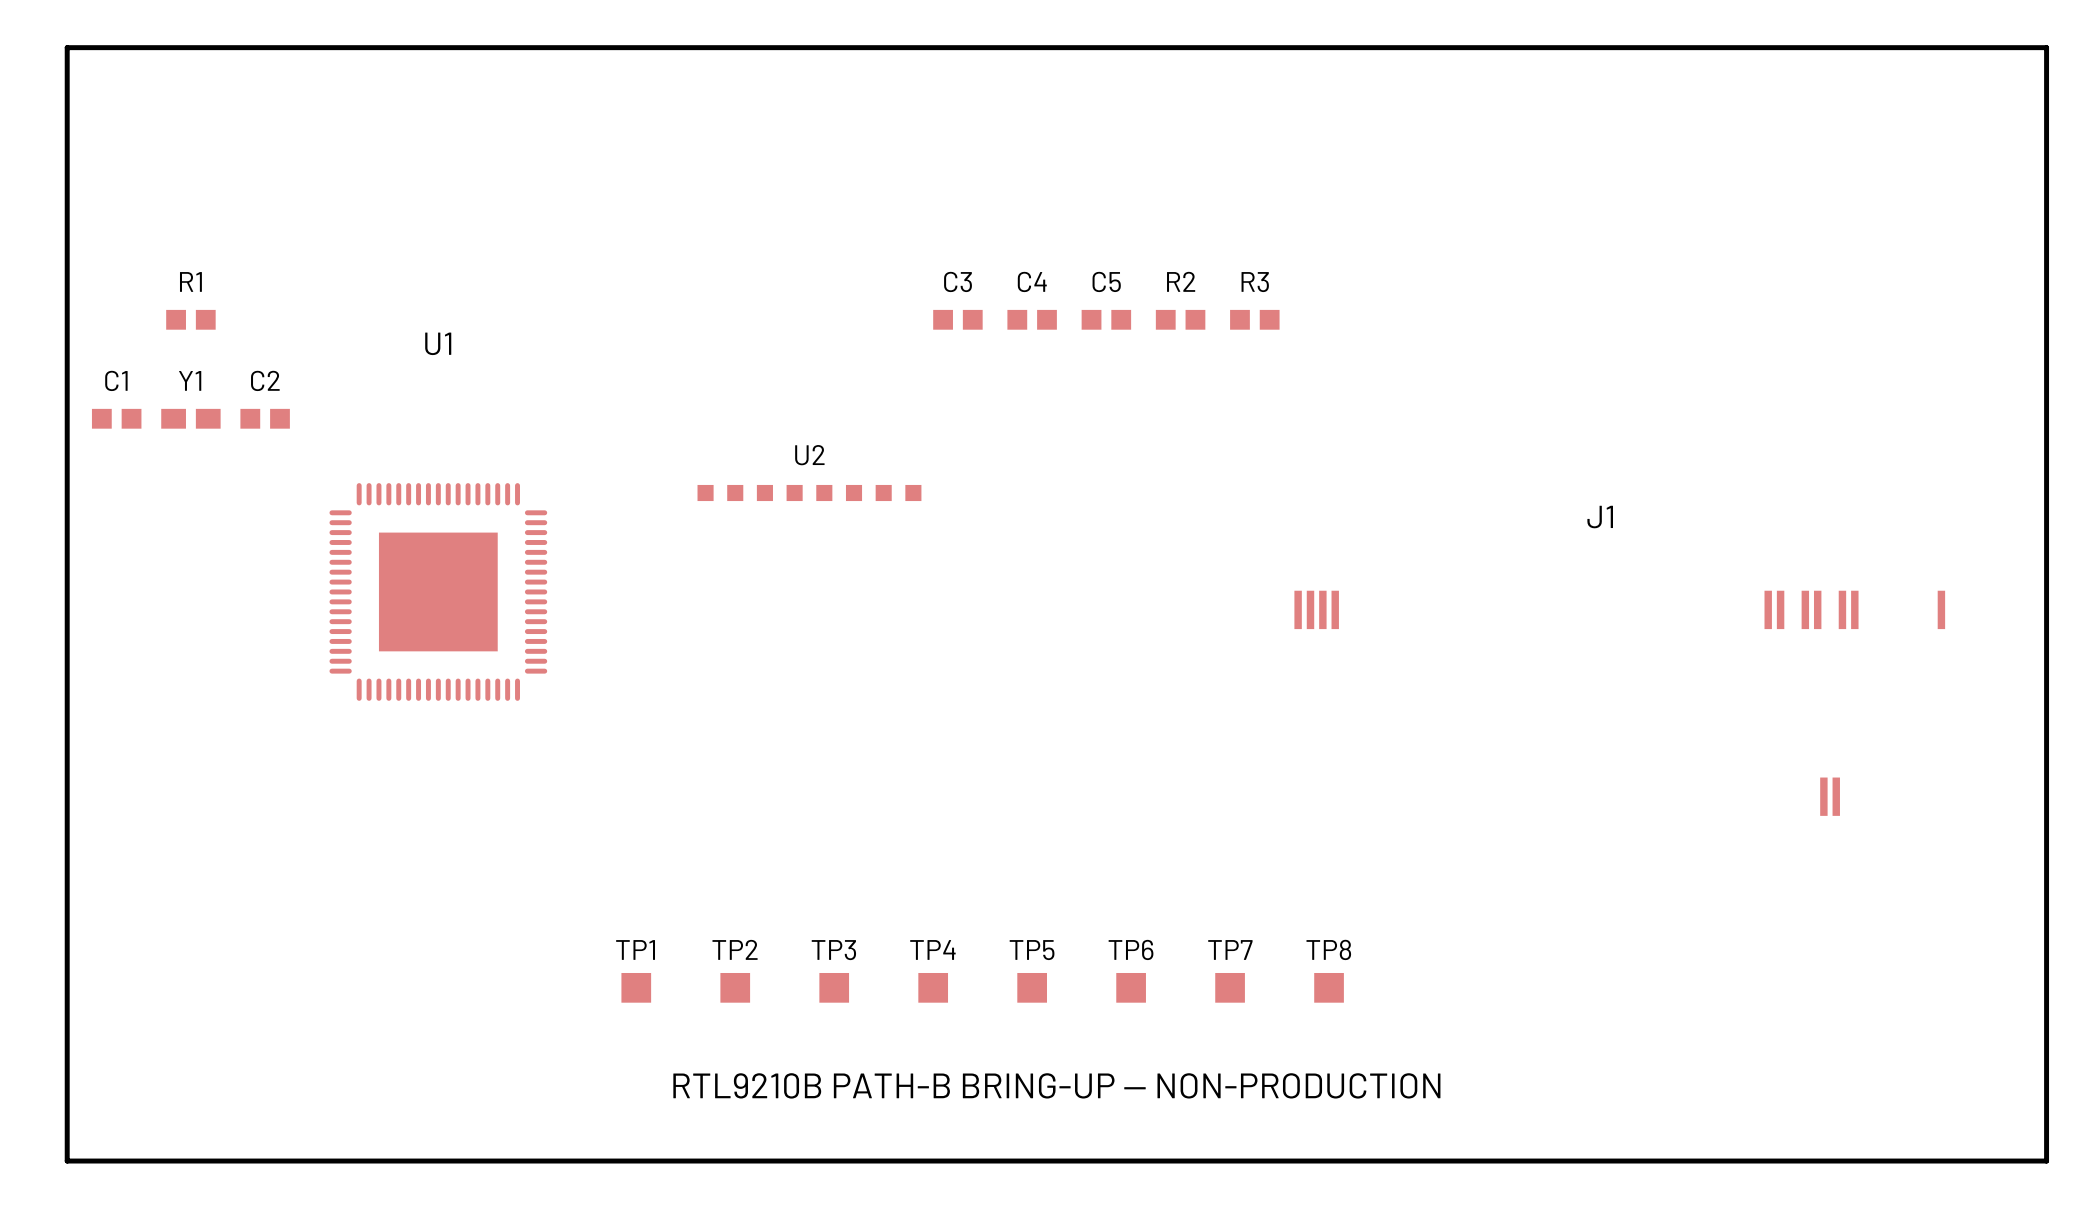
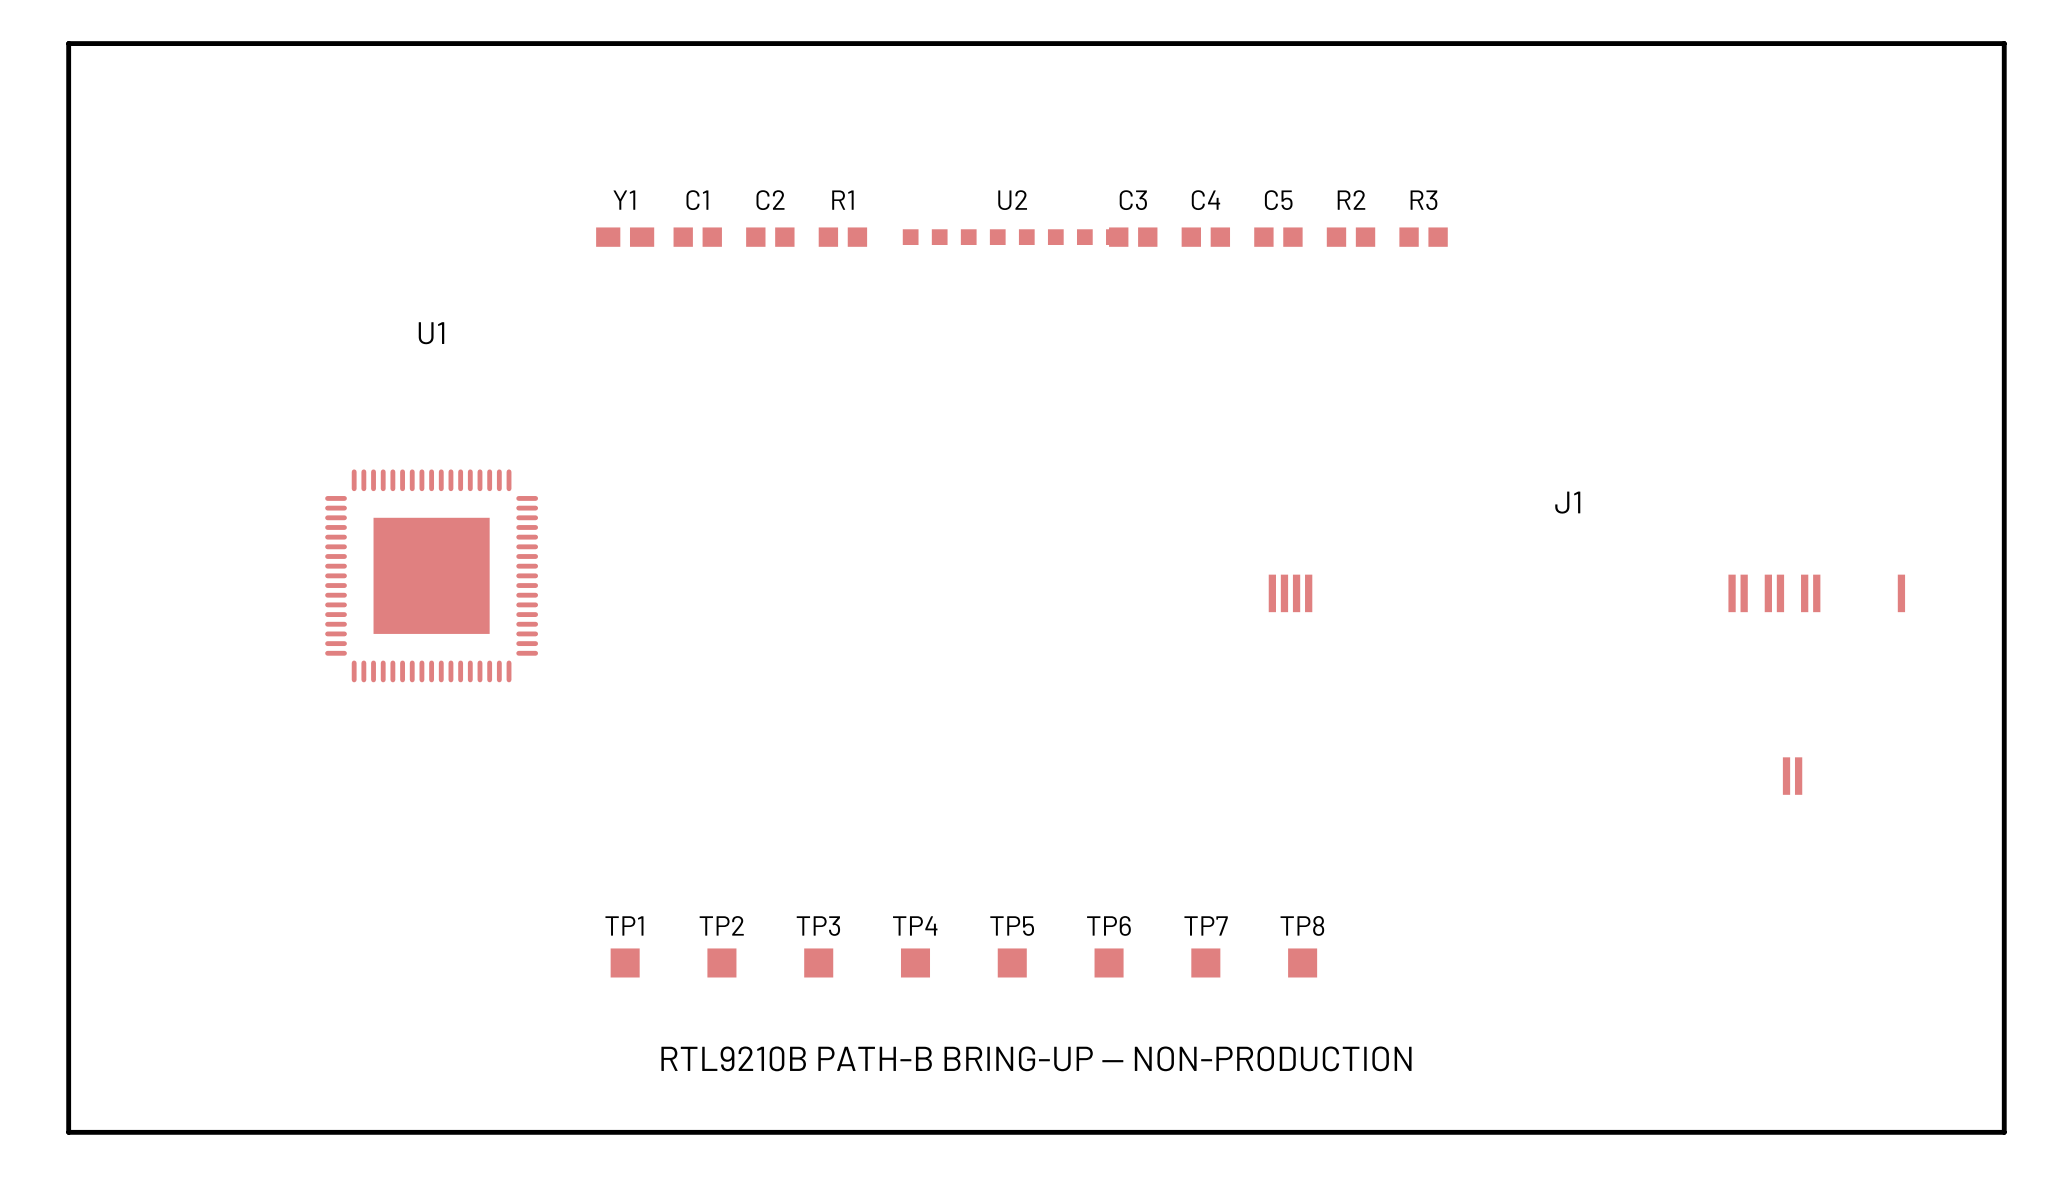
R1 position: (190, 319) -> (842, 237)
C3 position: (957, 319) -> (1133, 237)
C4 position: (1032, 319) -> (1205, 237)
C5 position: (1106, 319) -> (1278, 237)
R2 position: (1180, 319) -> (1351, 237)
R3 position: (1254, 319) -> (1423, 237)
C1 position: (116, 418) -> (697, 237)
Y1 position: (190, 418) -> (625, 237)
C2 position: (265, 418) -> (770, 237)
U2 position: (809, 493) -> (1012, 237)

